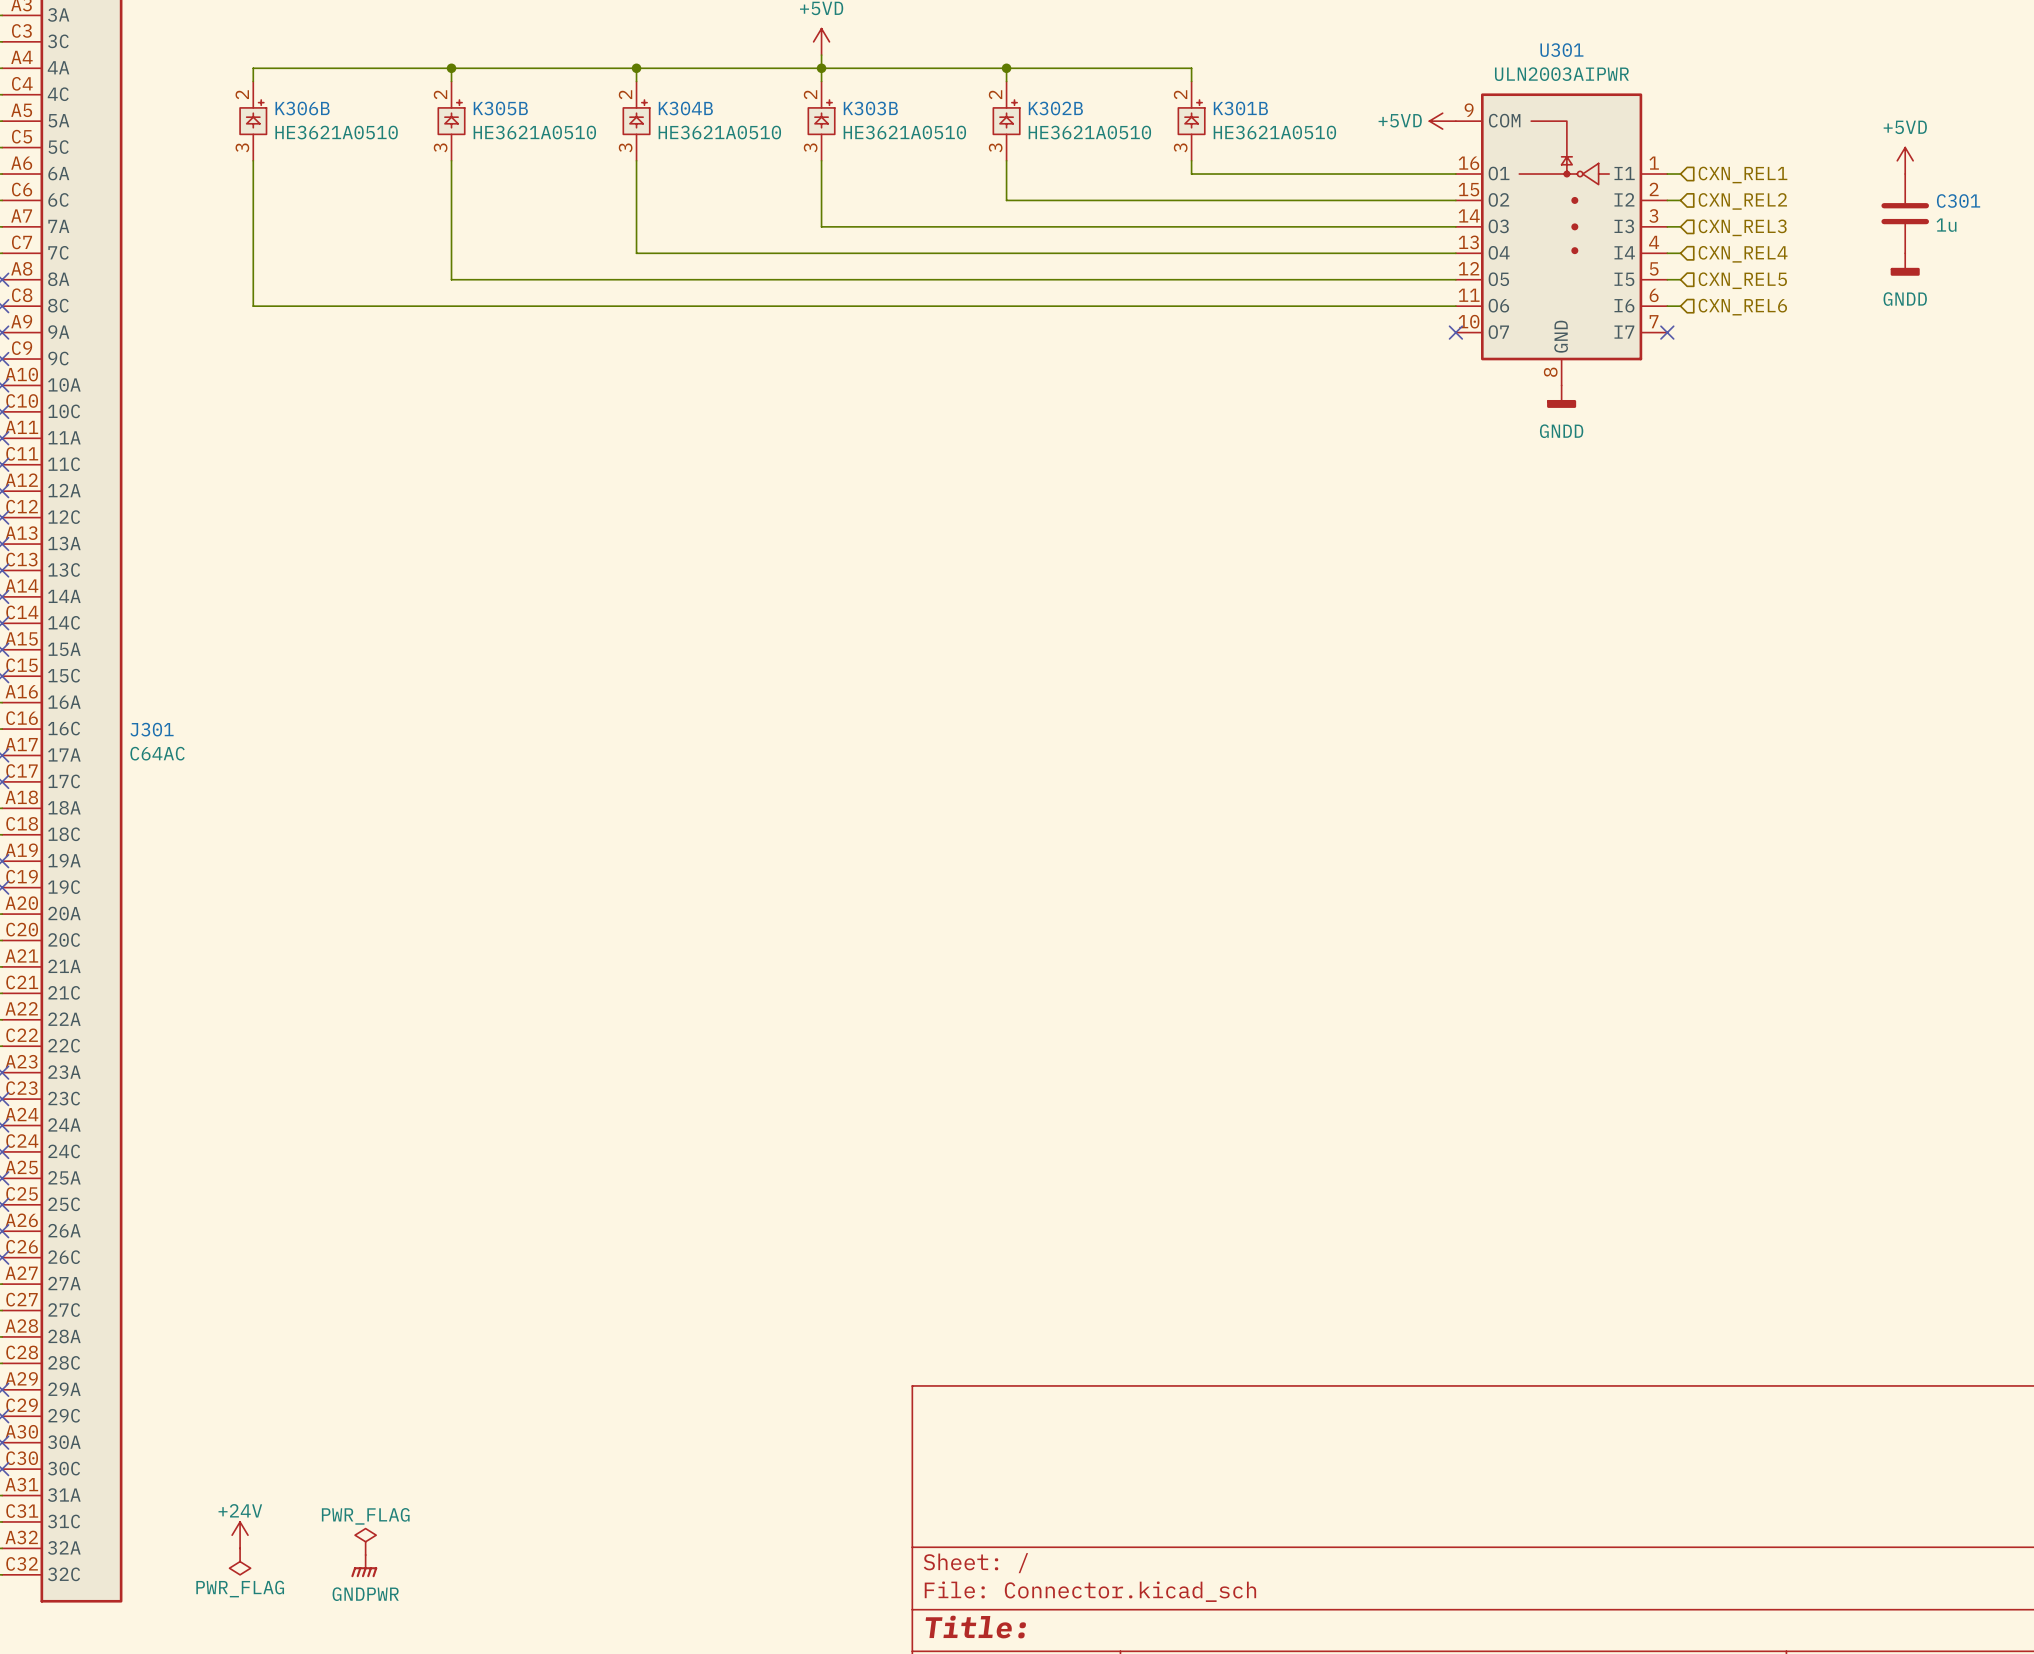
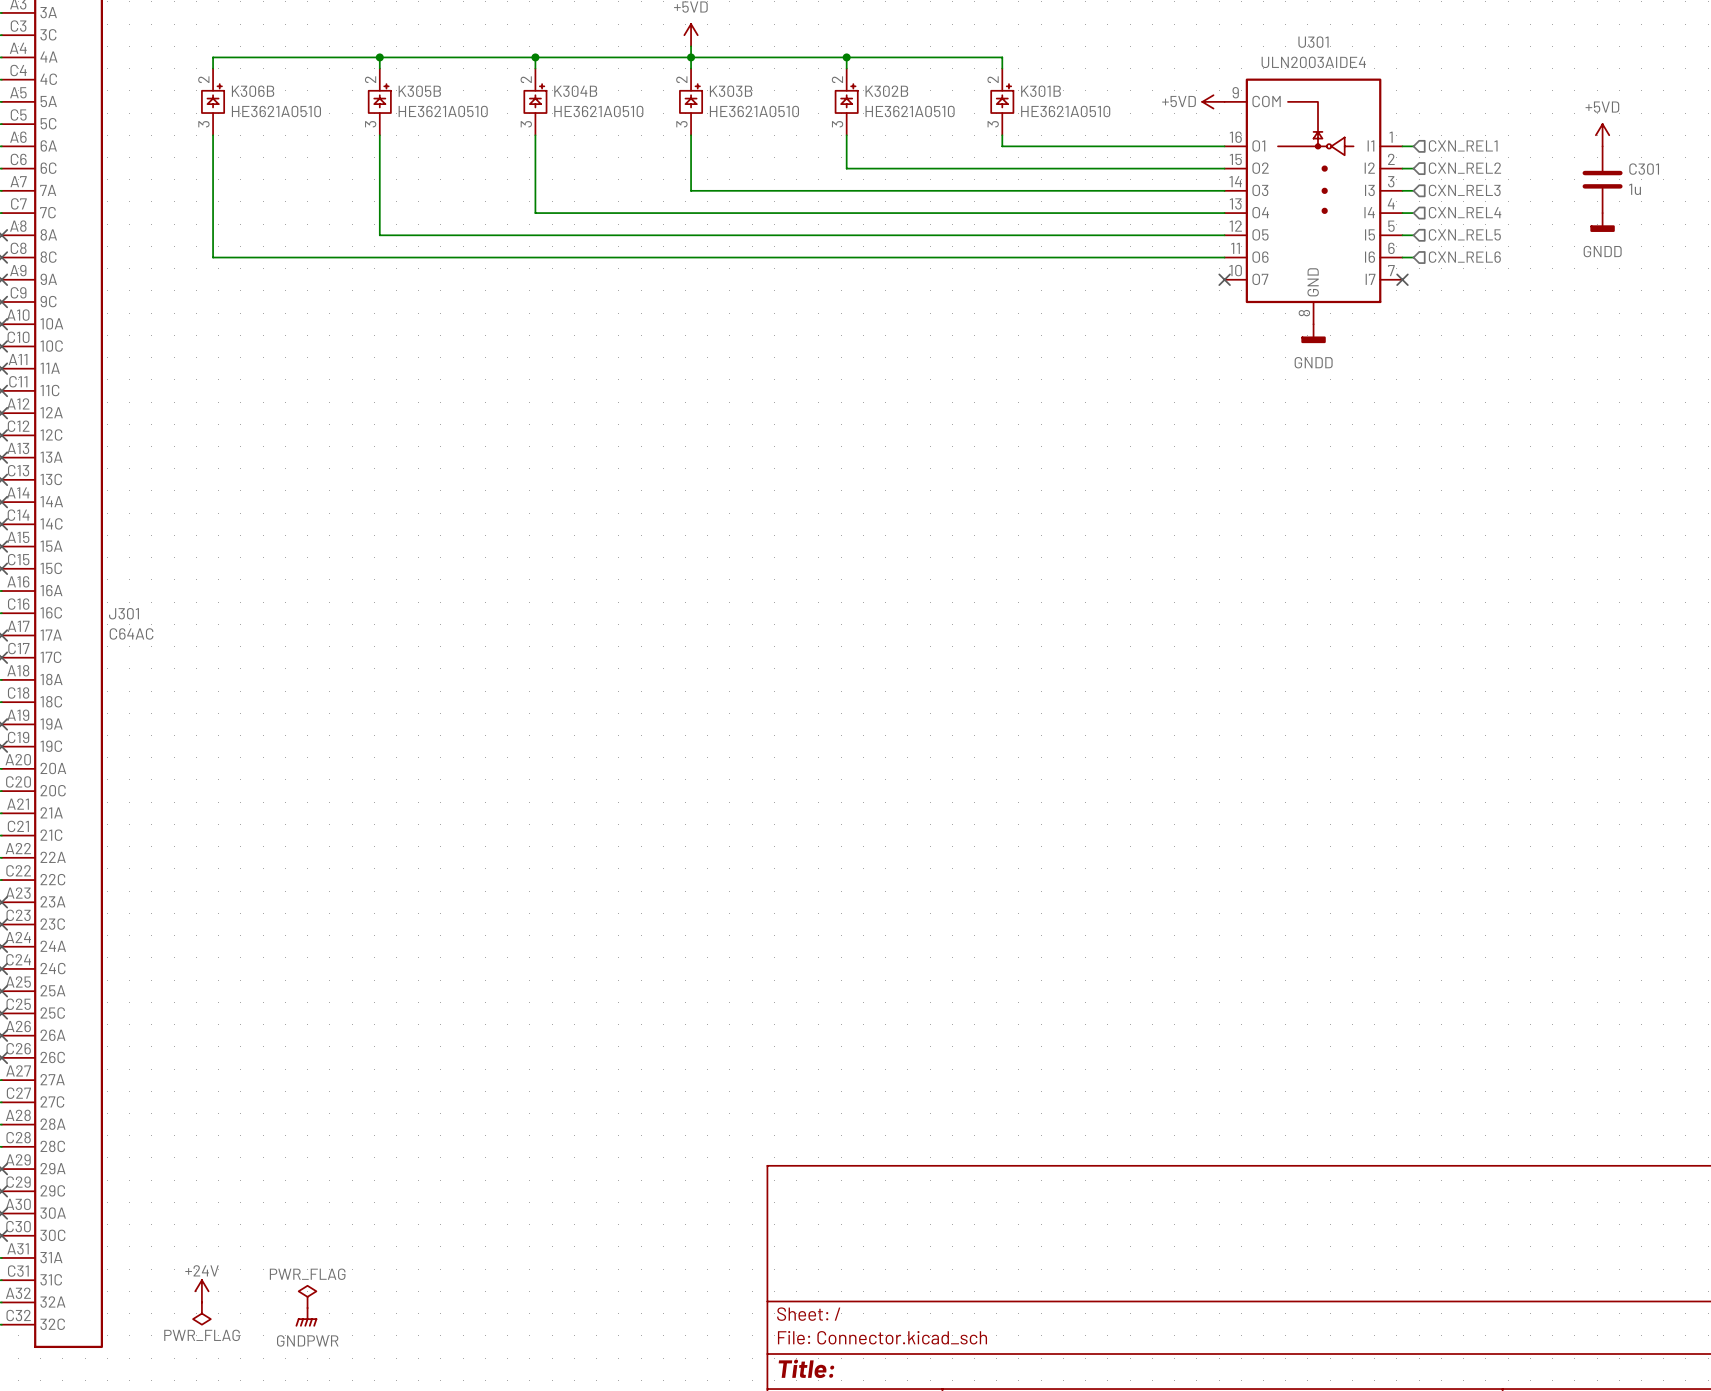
U301 value: ULN2003AIPWR (1561, 74) -> ULN2003AIDE4 (1313, 62)

